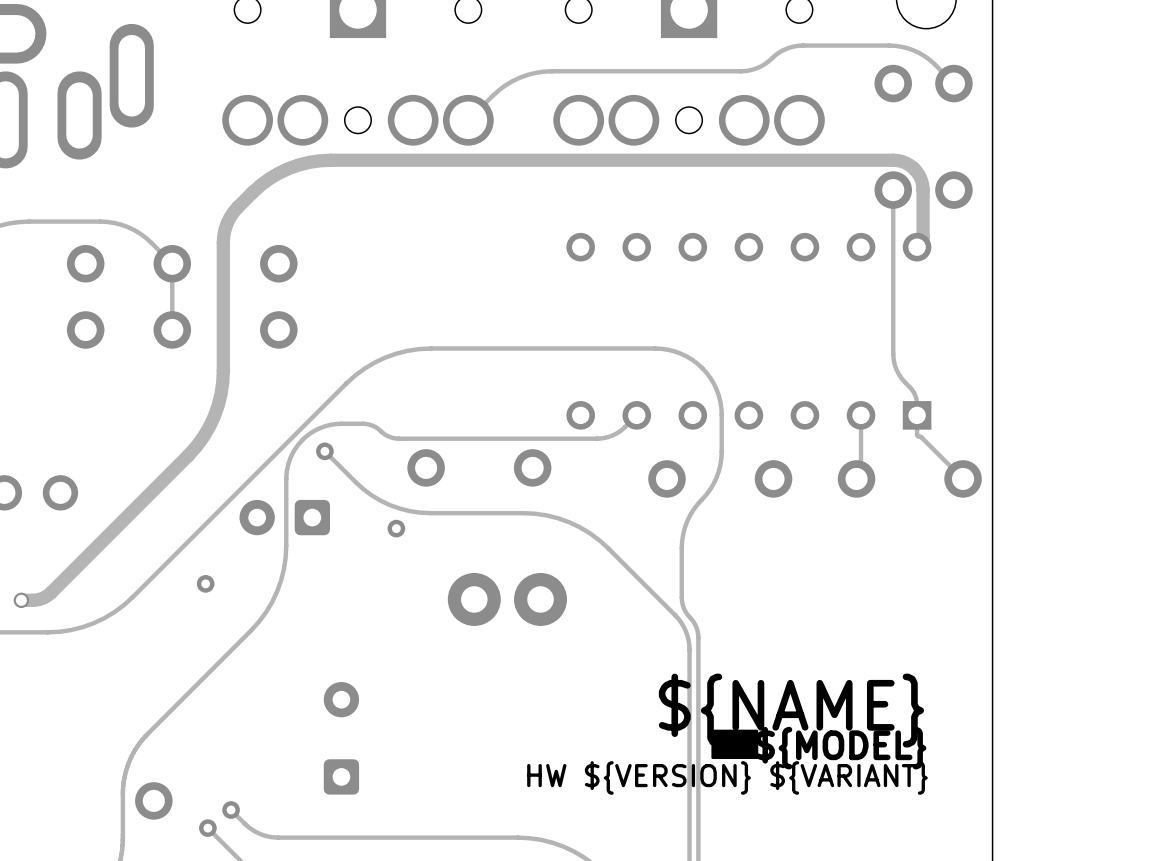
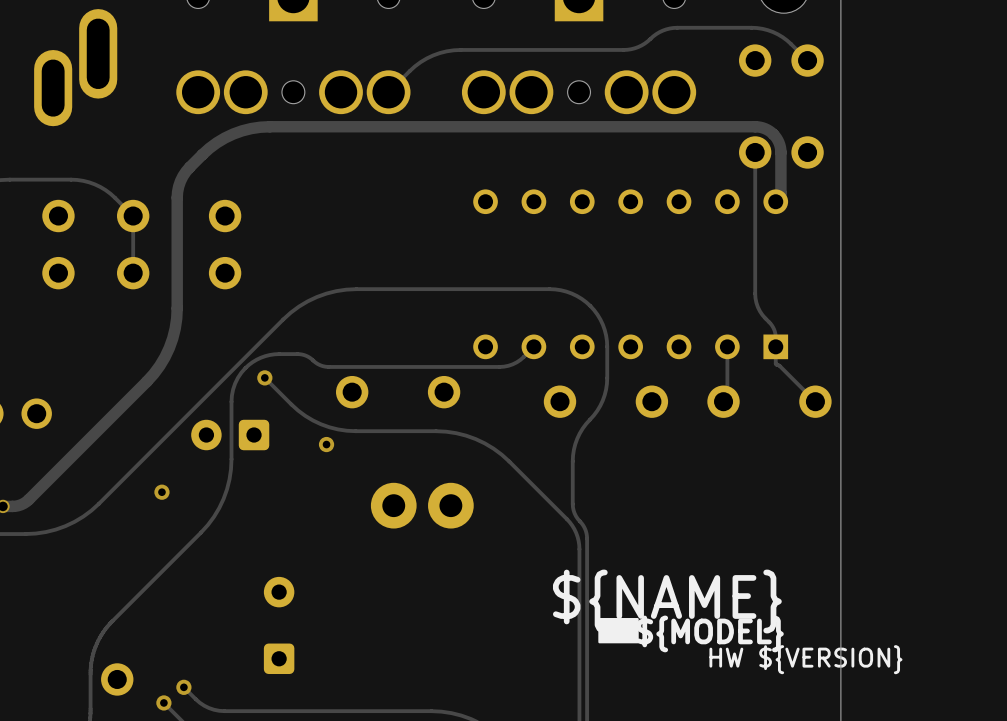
text: HW ${VERSION} ${VARIANT} (727, 777) -> HW ${VERSION} (805, 659)

